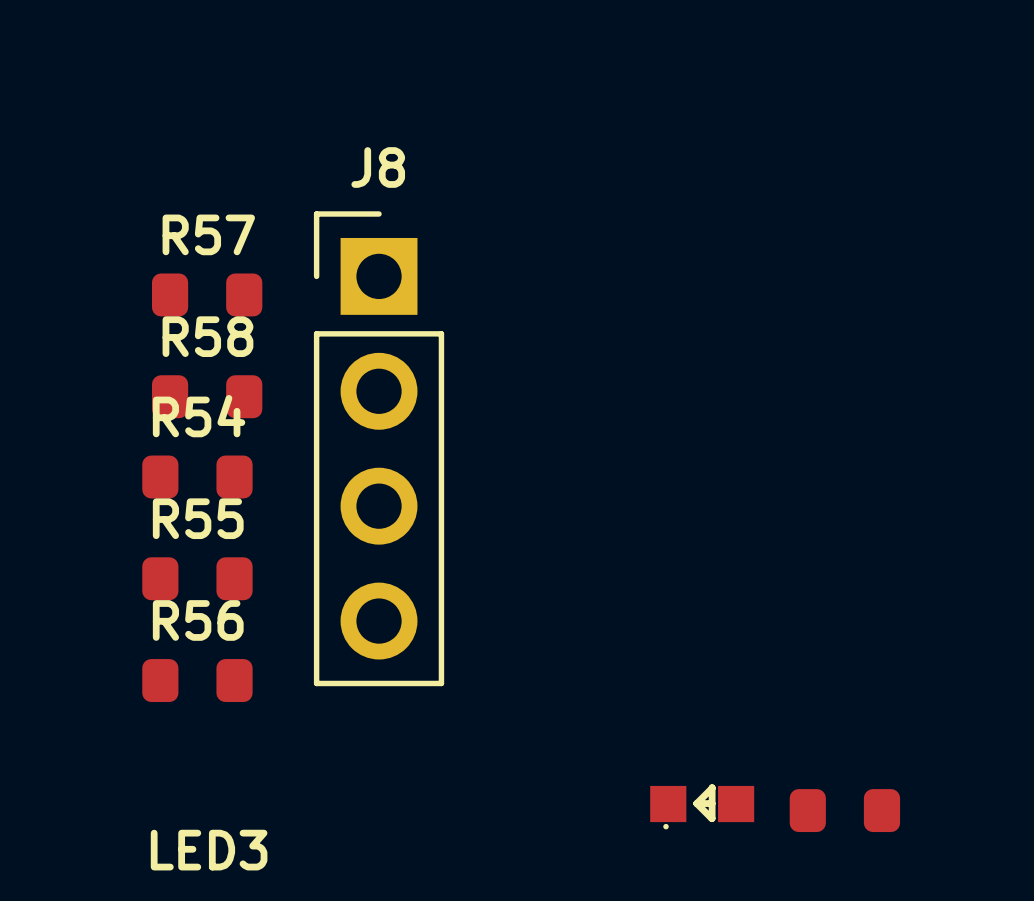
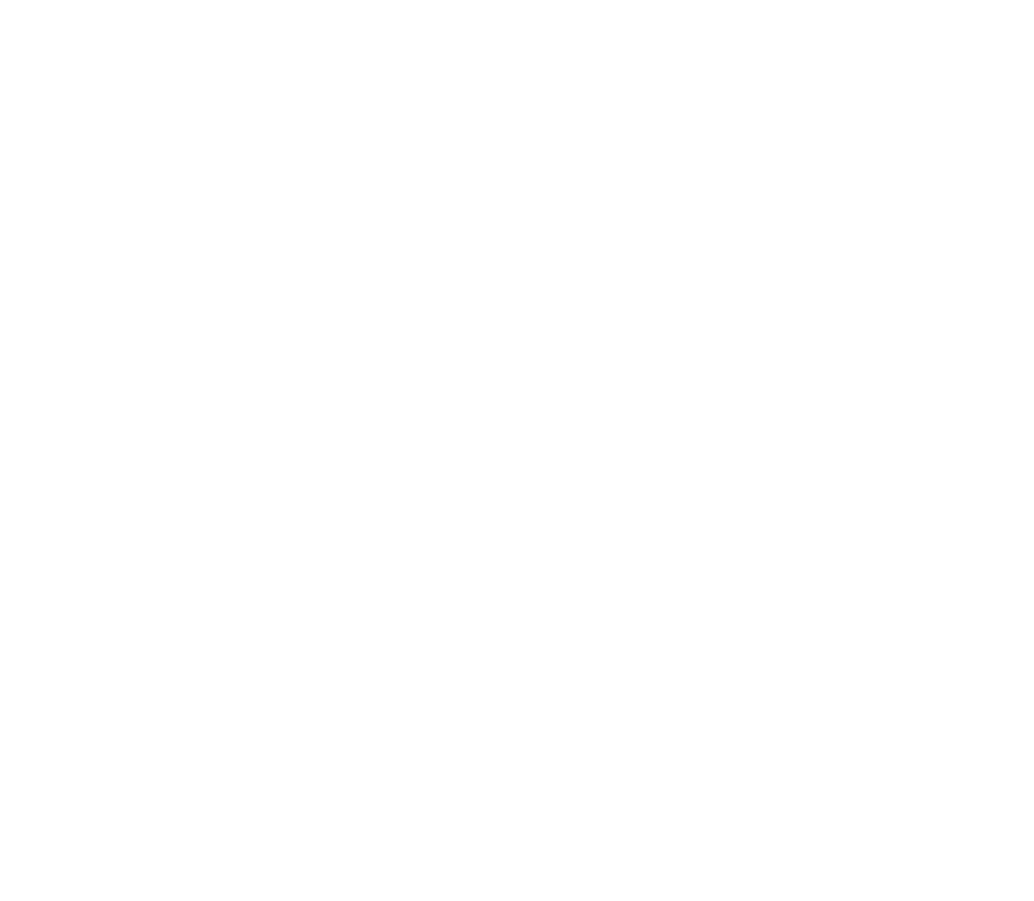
R57: (207, 294) -> none
R58: (207, 396) -> none
J8: (379, 448) -> none
R54: (197, 477) -> none
R55: (197, 578) -> none
R56: (197, 680) -> none
LED3: (702, 806) -> none
part: (844, 810) -> none

